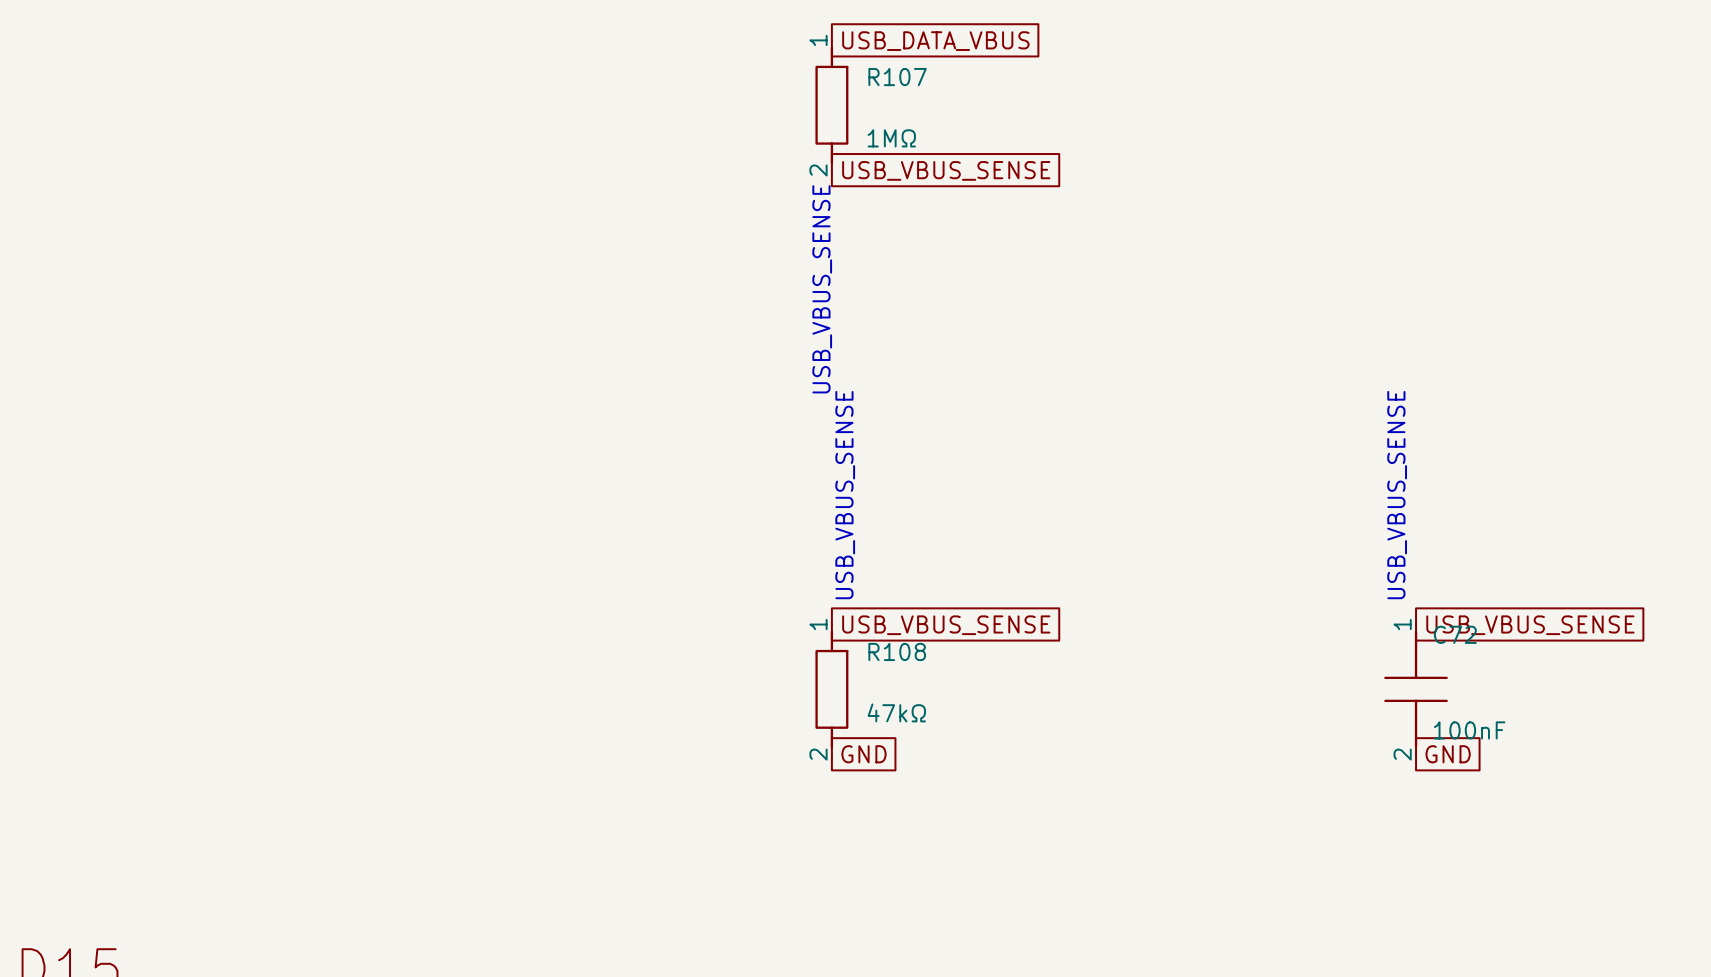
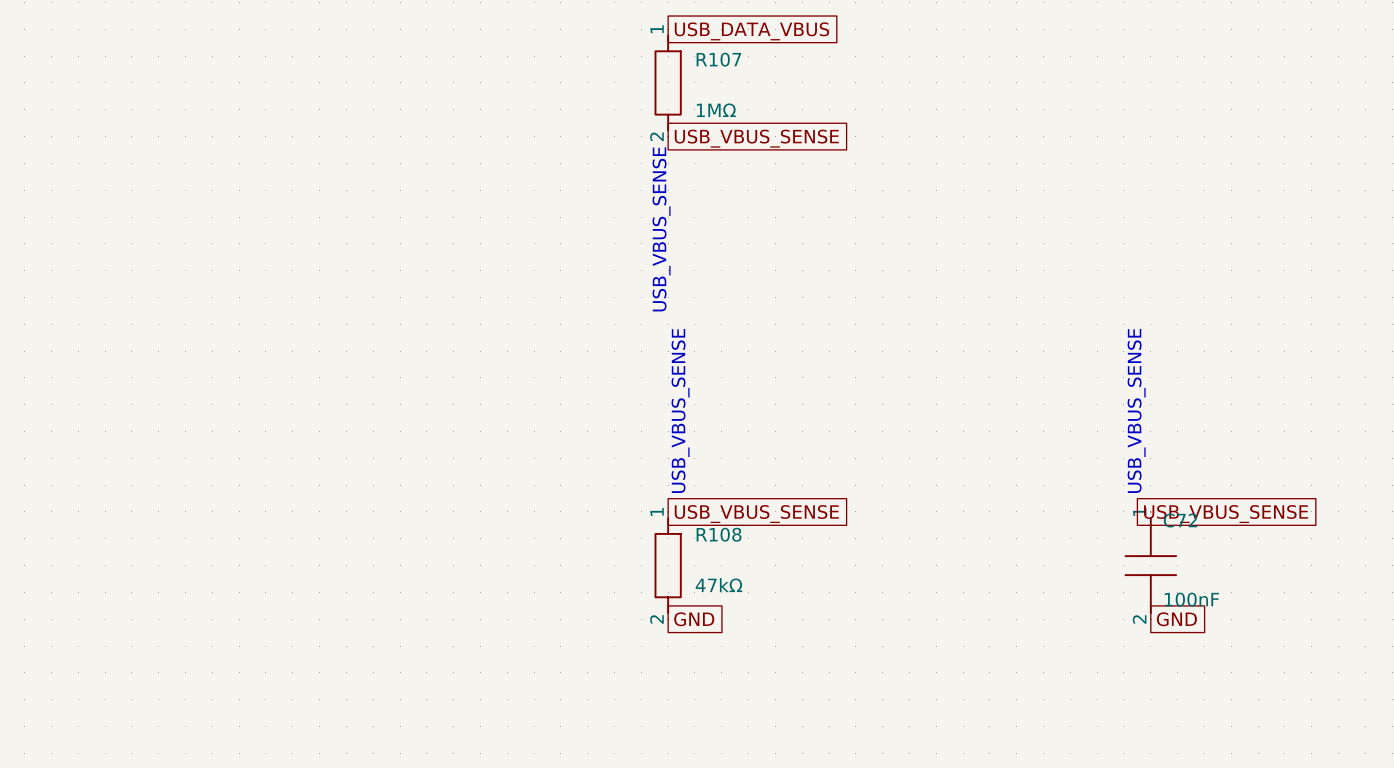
global label position: USB_VBUS_SENSE (1530, 625) -> USB_VBUS_SENSE (1226, 514)

